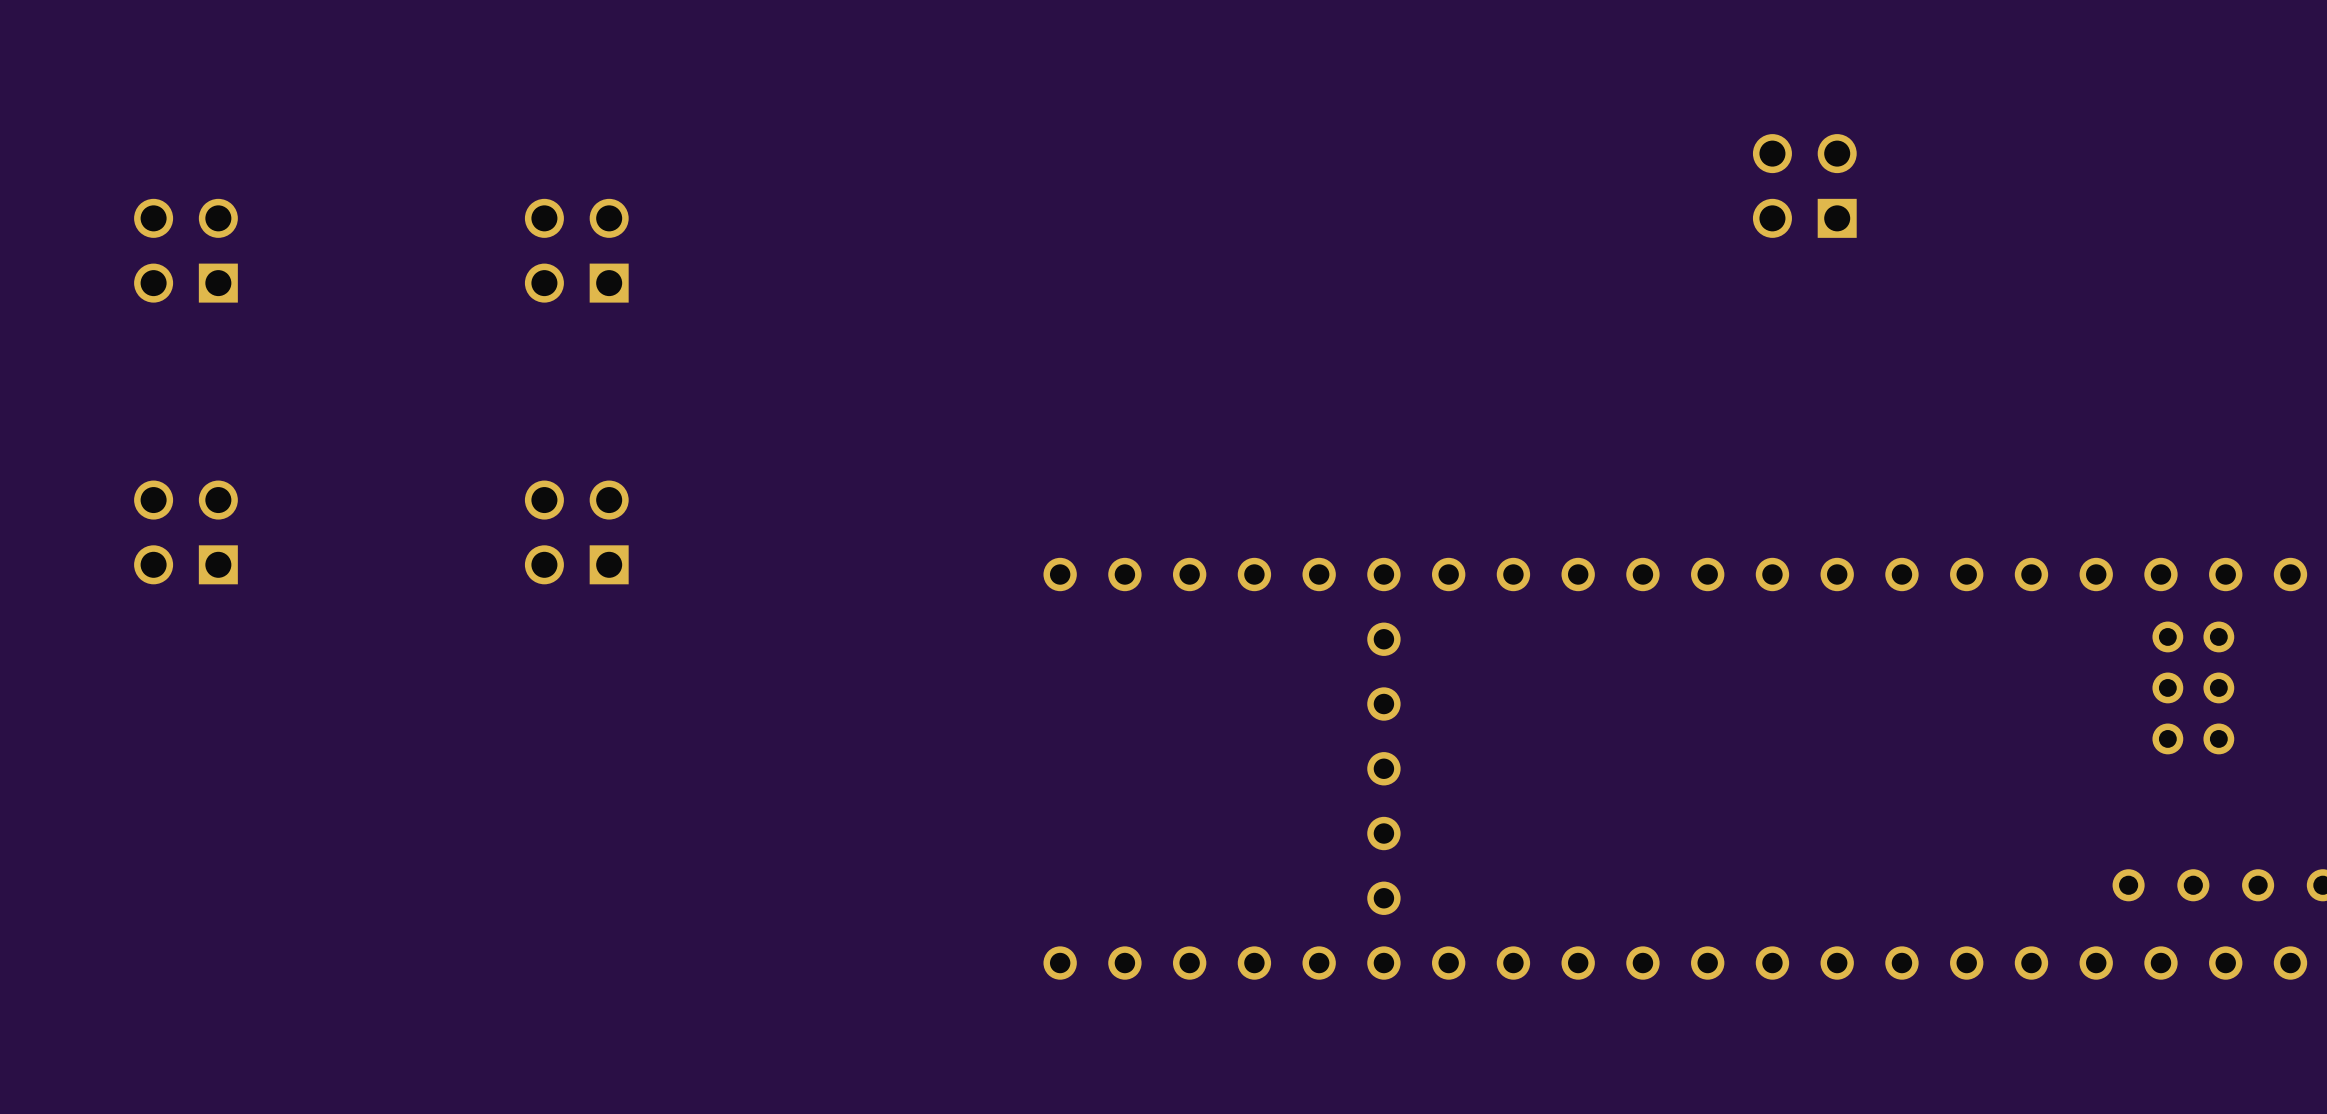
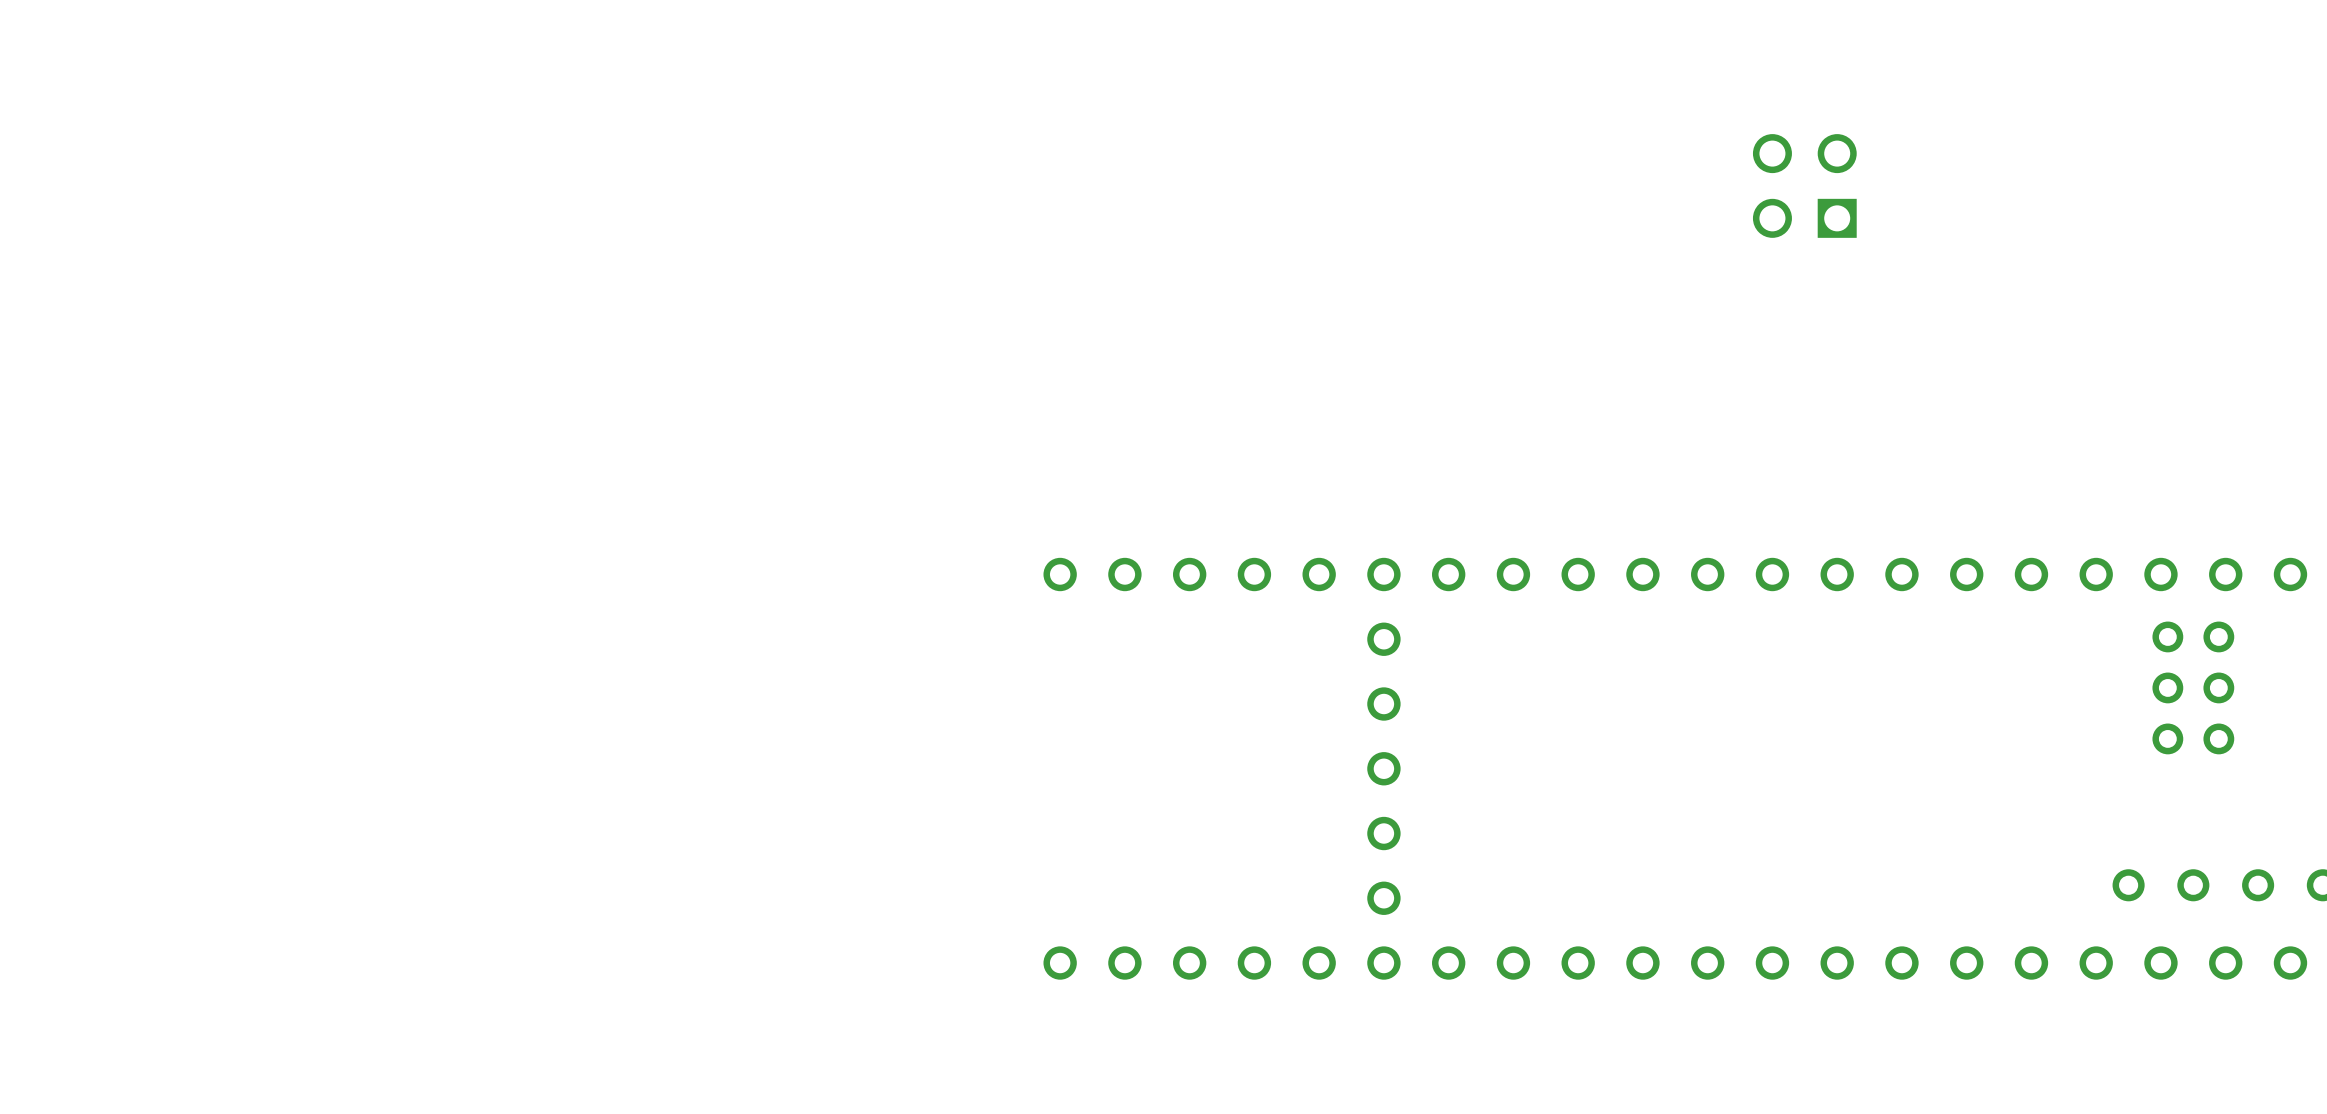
part: (185, 250) -> none
part: (576, 250) -> none
part: (185, 532) -> none
part: (576, 532) -> none

